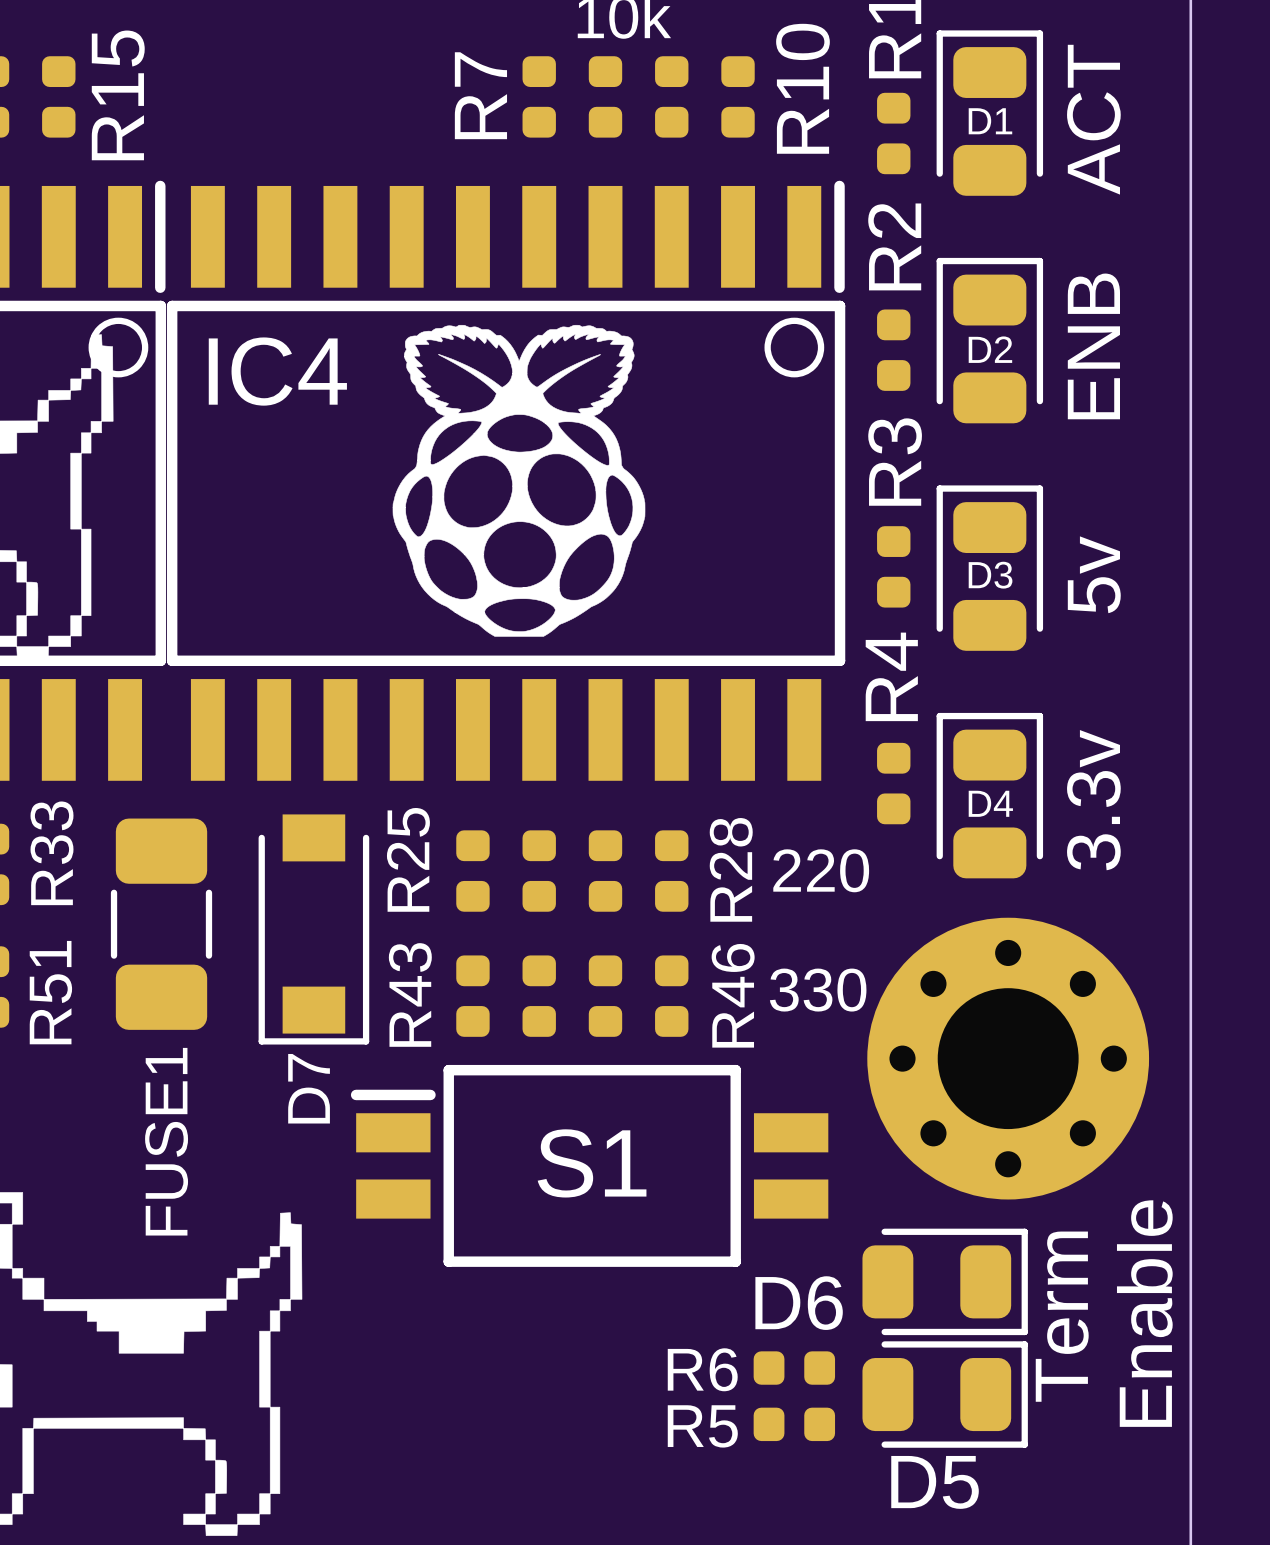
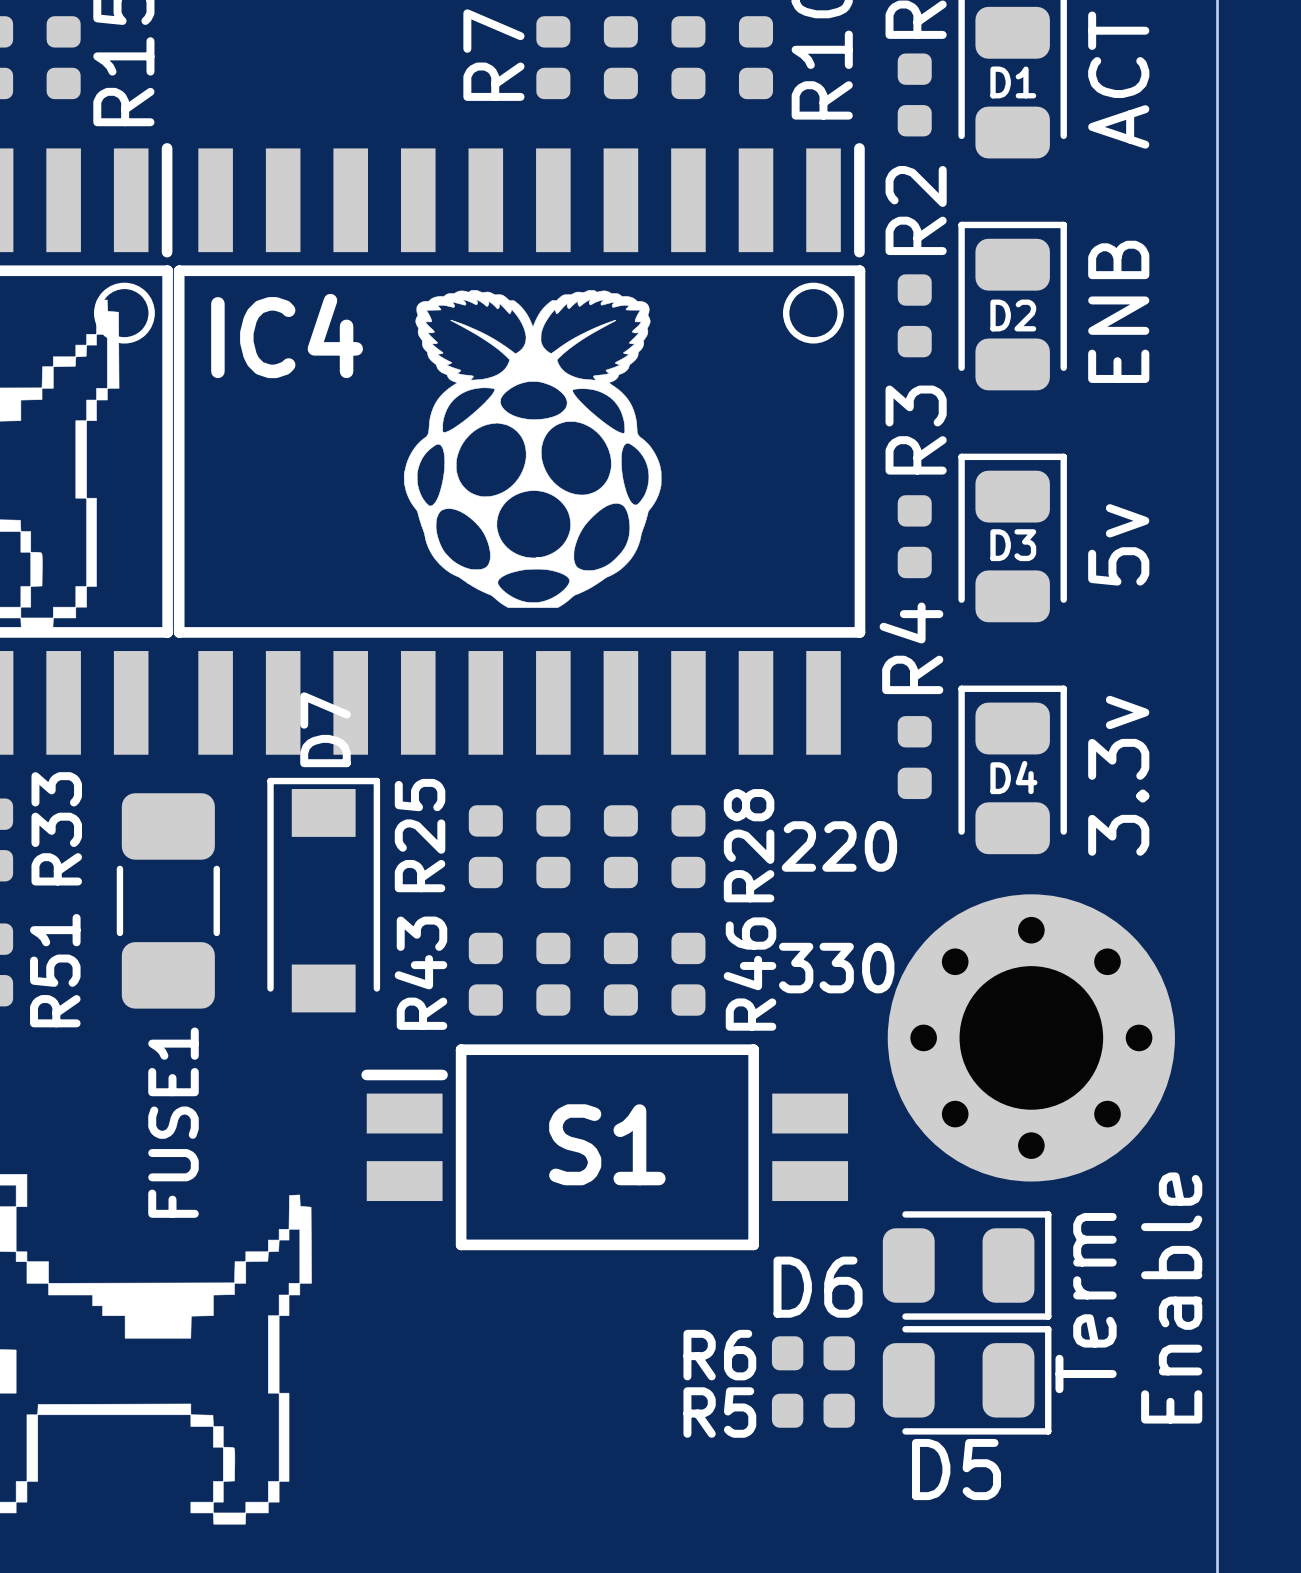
D7 rotation: 0° (313, 929) -> 180° (323, 895)

